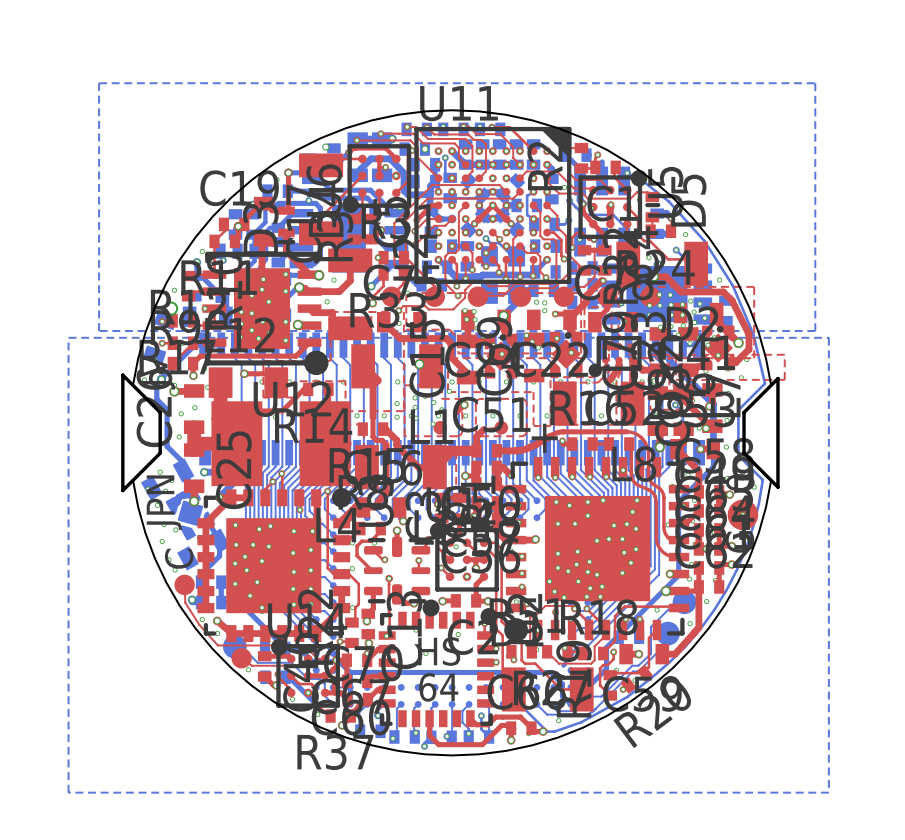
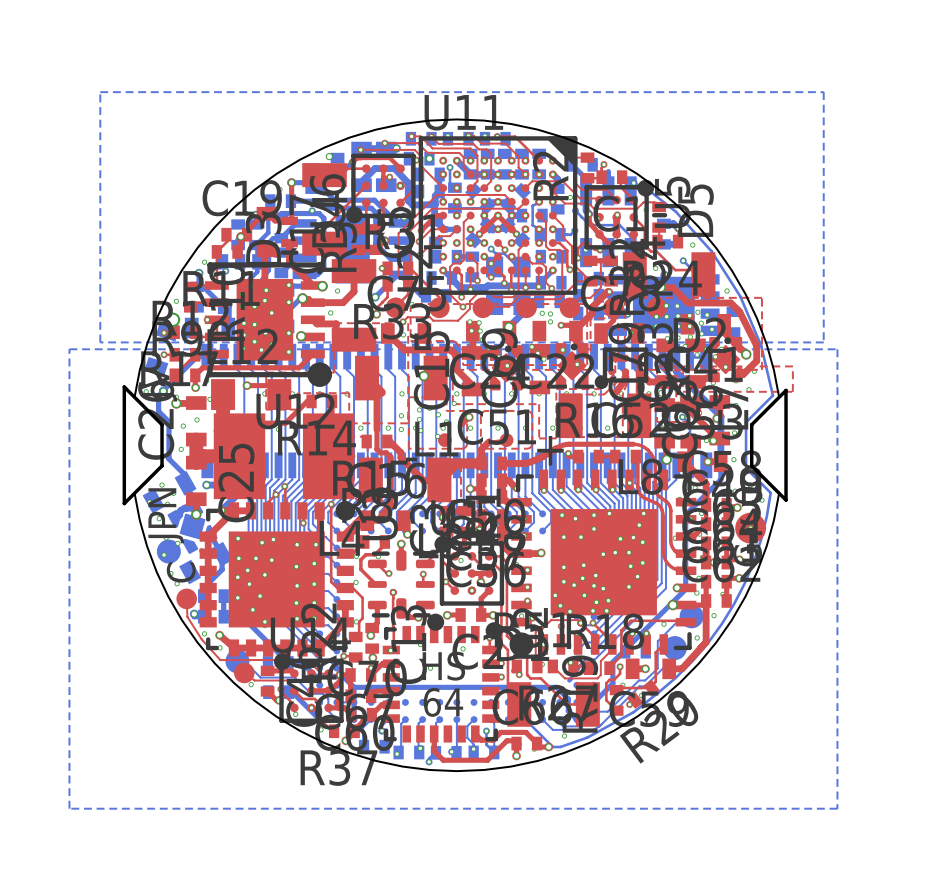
part: none -> (168, 551)

